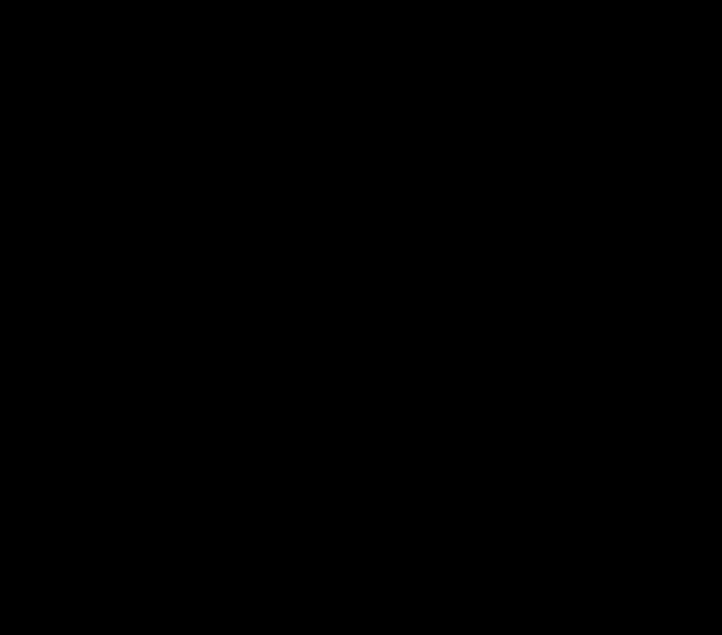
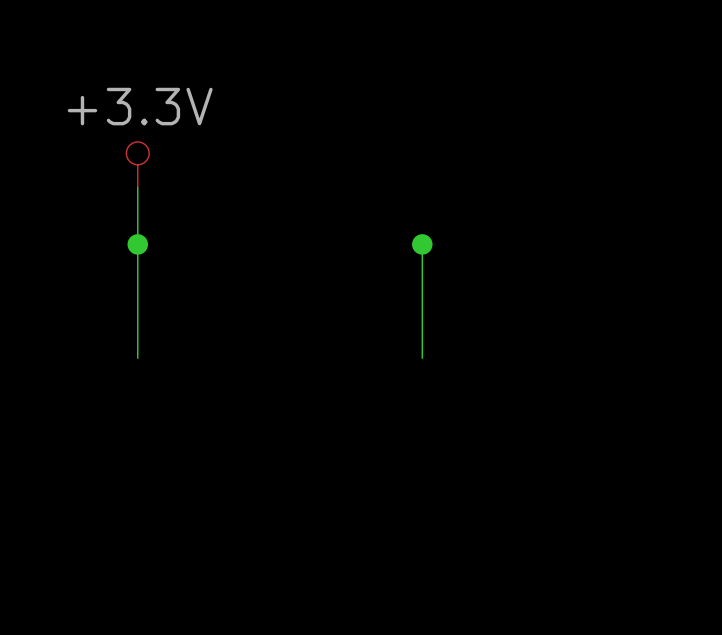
power symbol: none -> +3.3V (137, 164)
wire: none -> (137, 187) (137, 358)
junction: none -> (137, 244)
wire: none -> (422, 244) (422, 358)
junction: none -> (422, 244)

